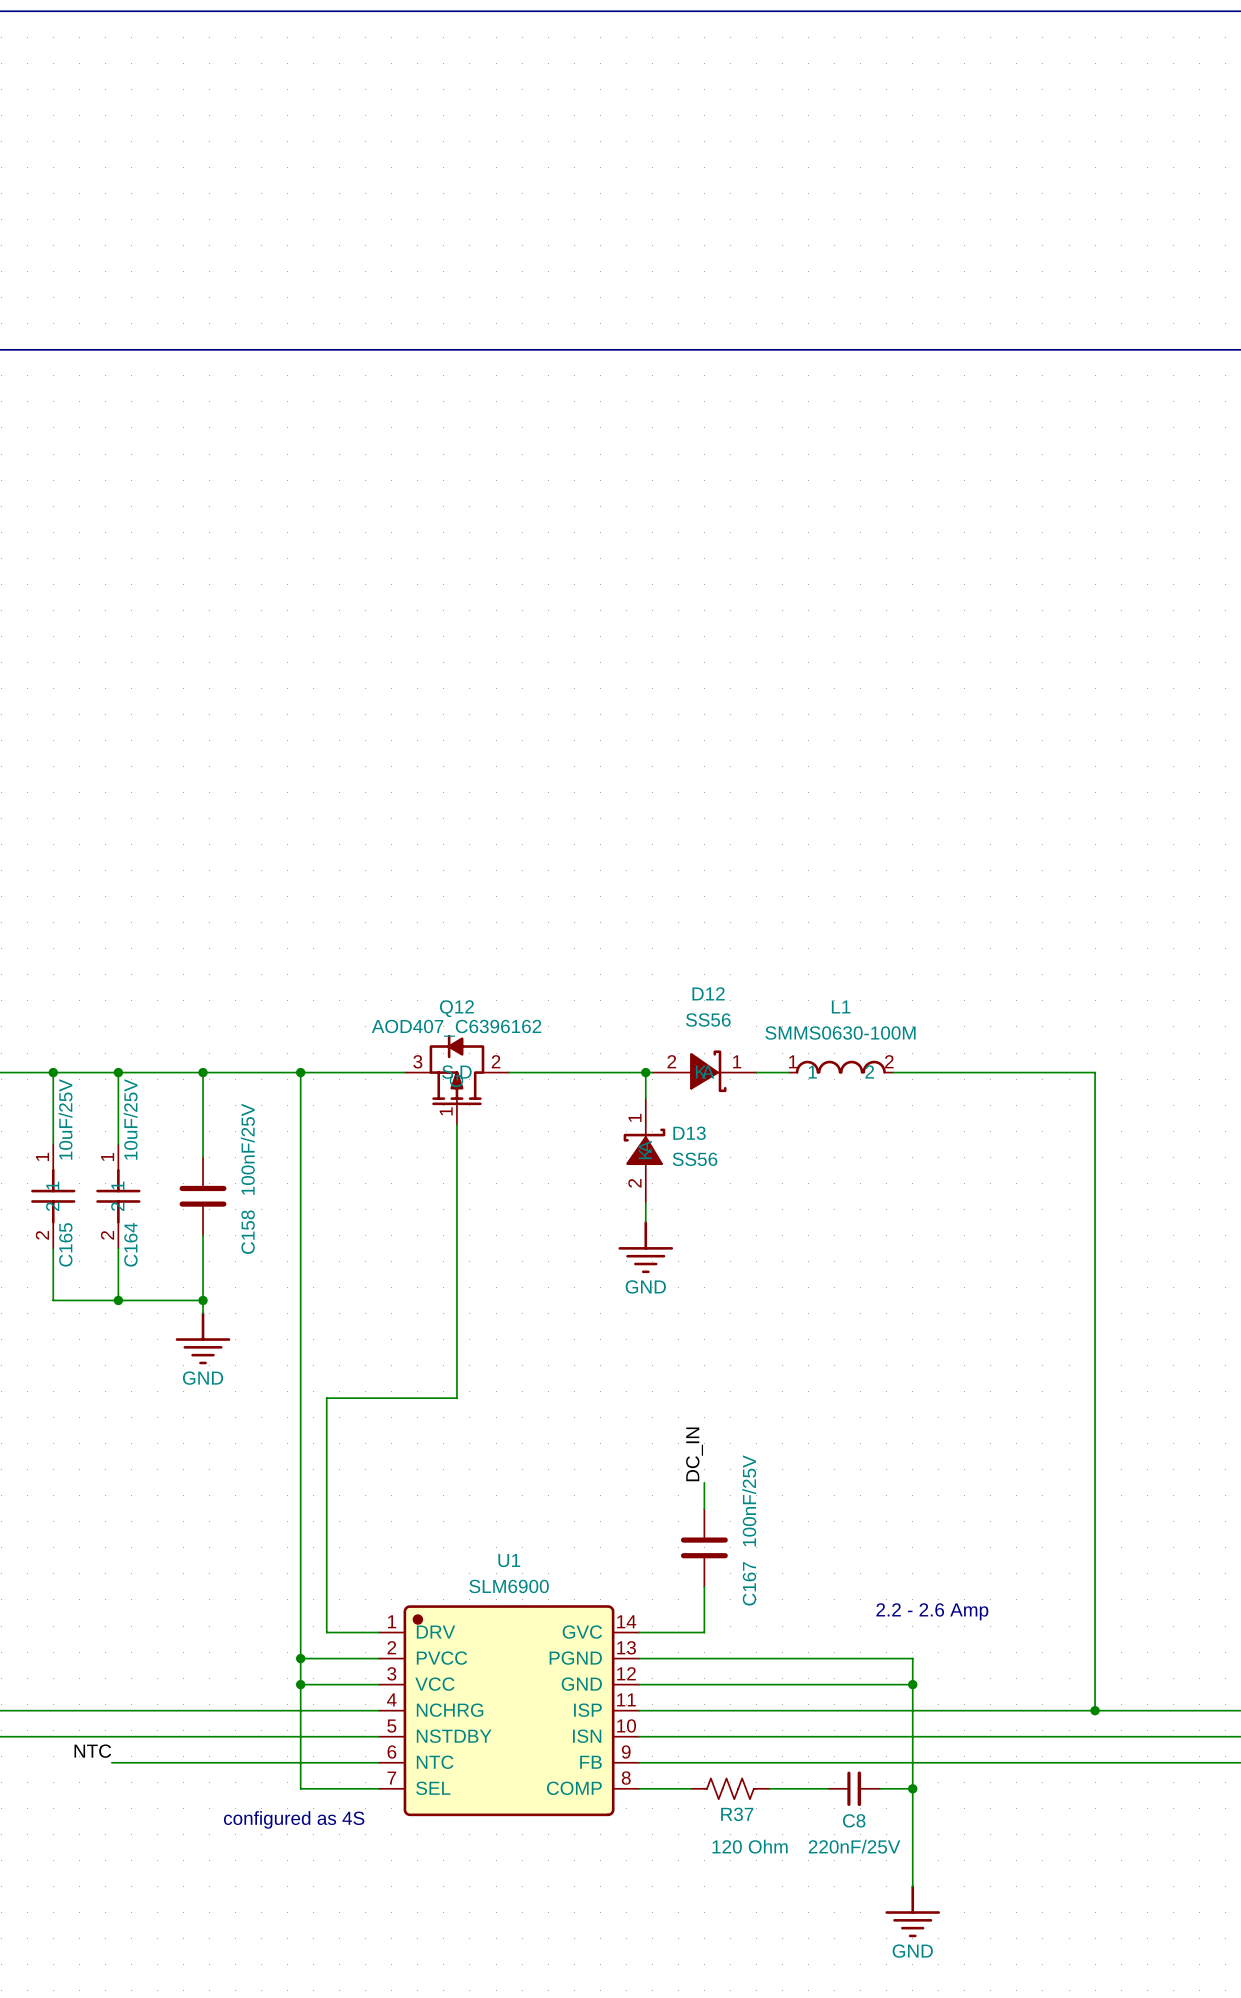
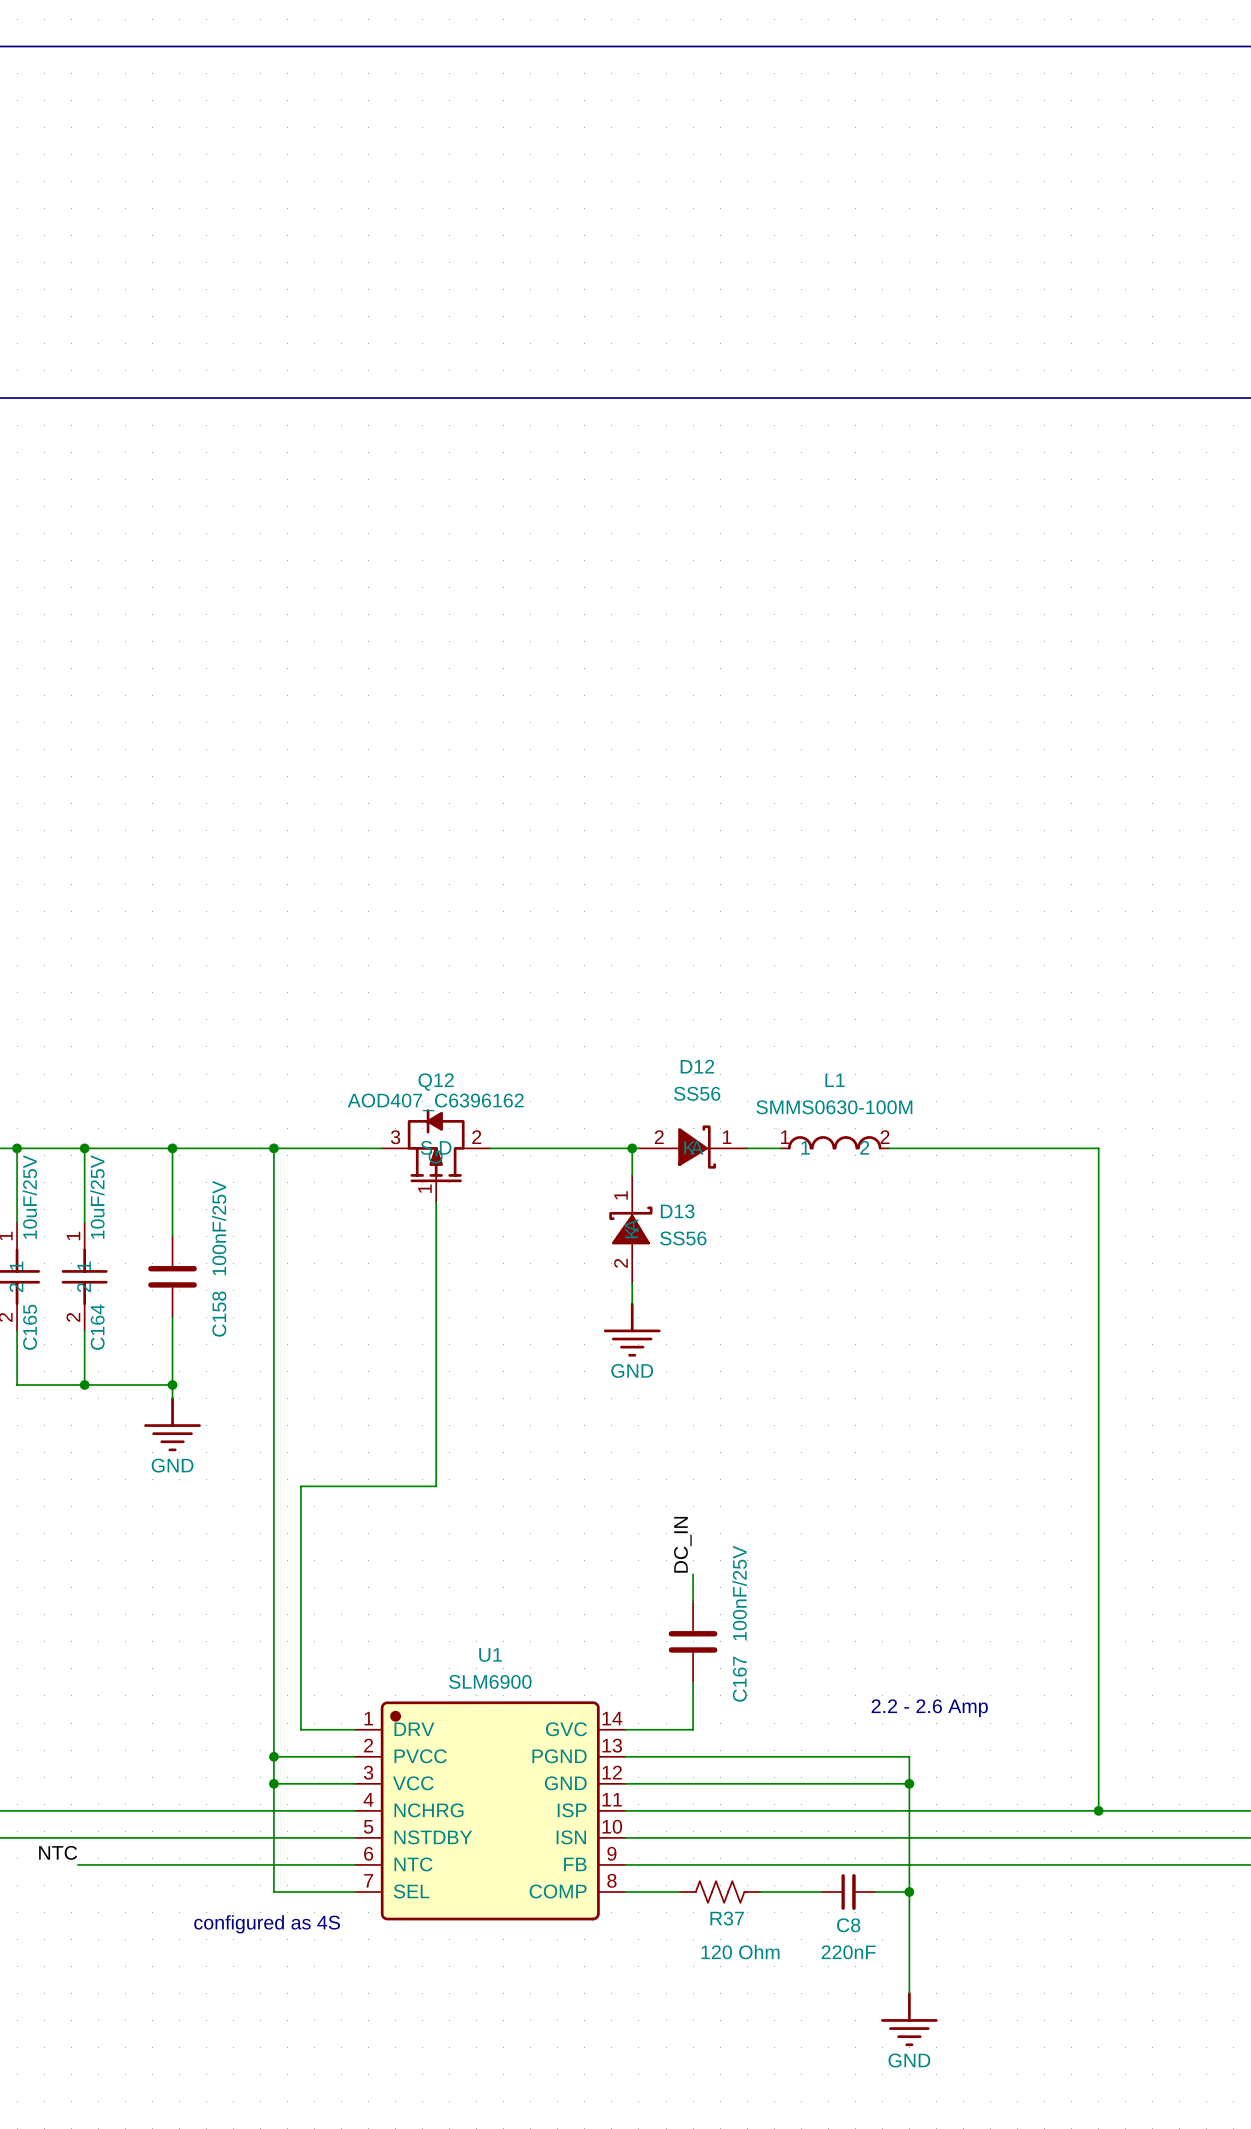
C8 value: 220nF/25V (854, 1846) -> 220nF (848, 1952)

